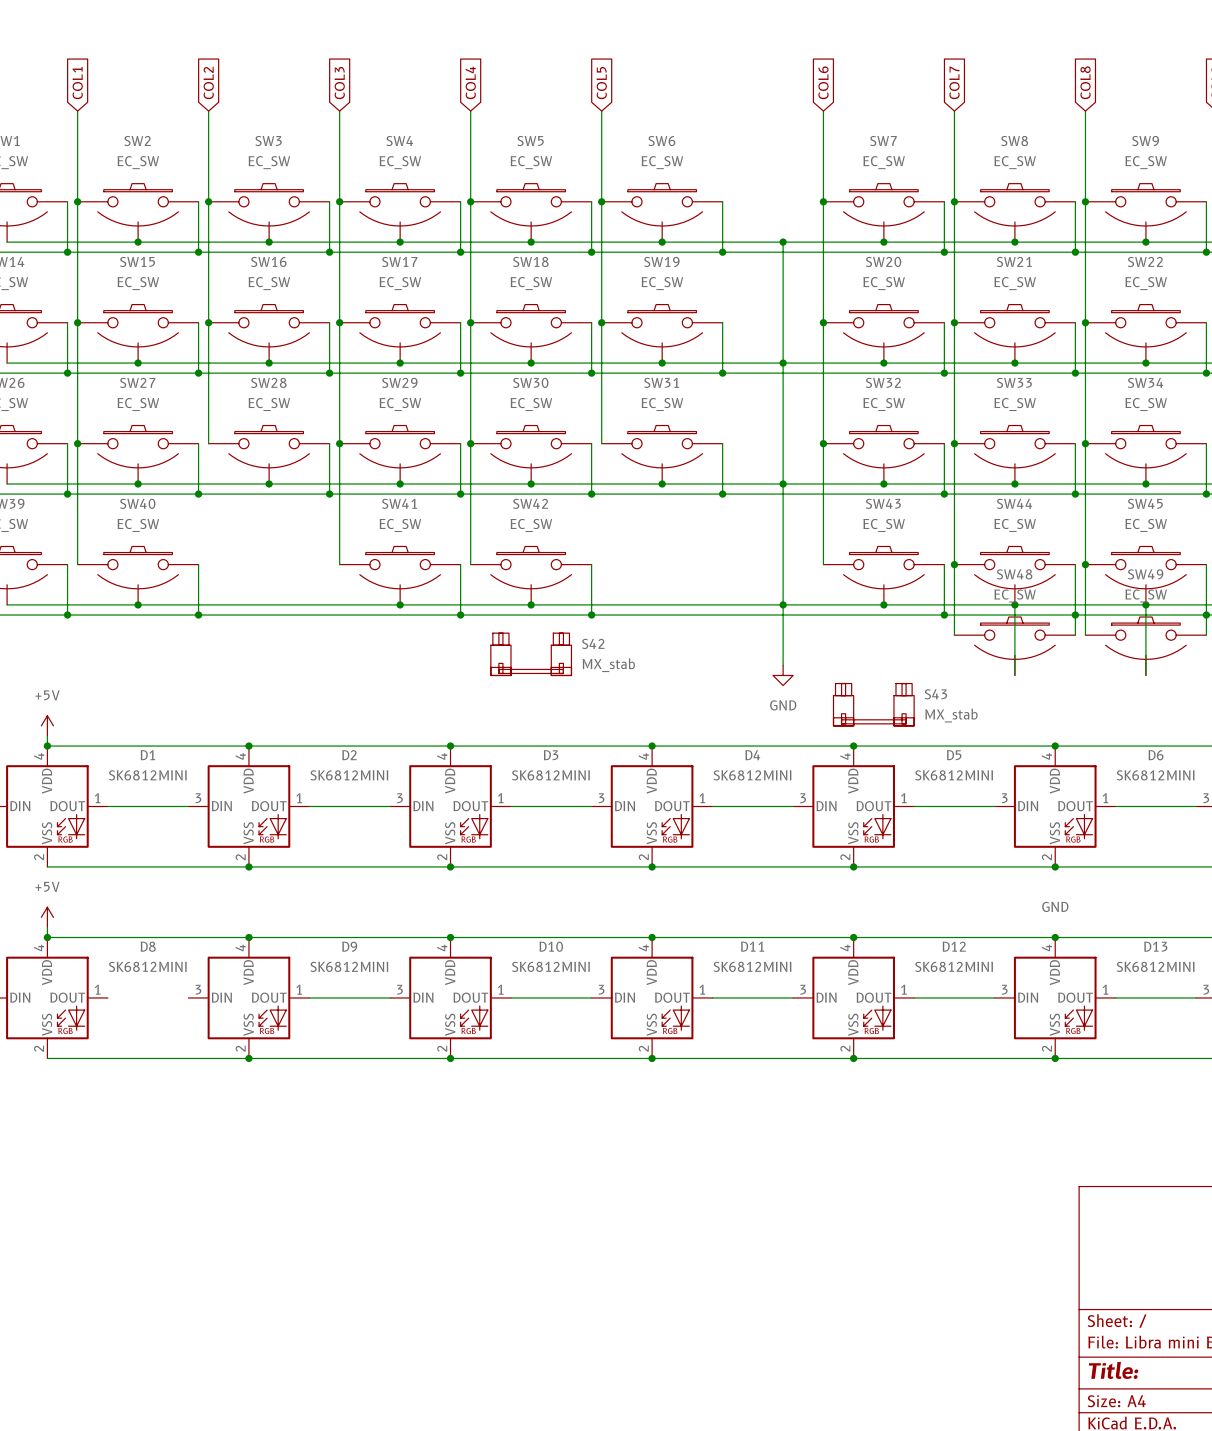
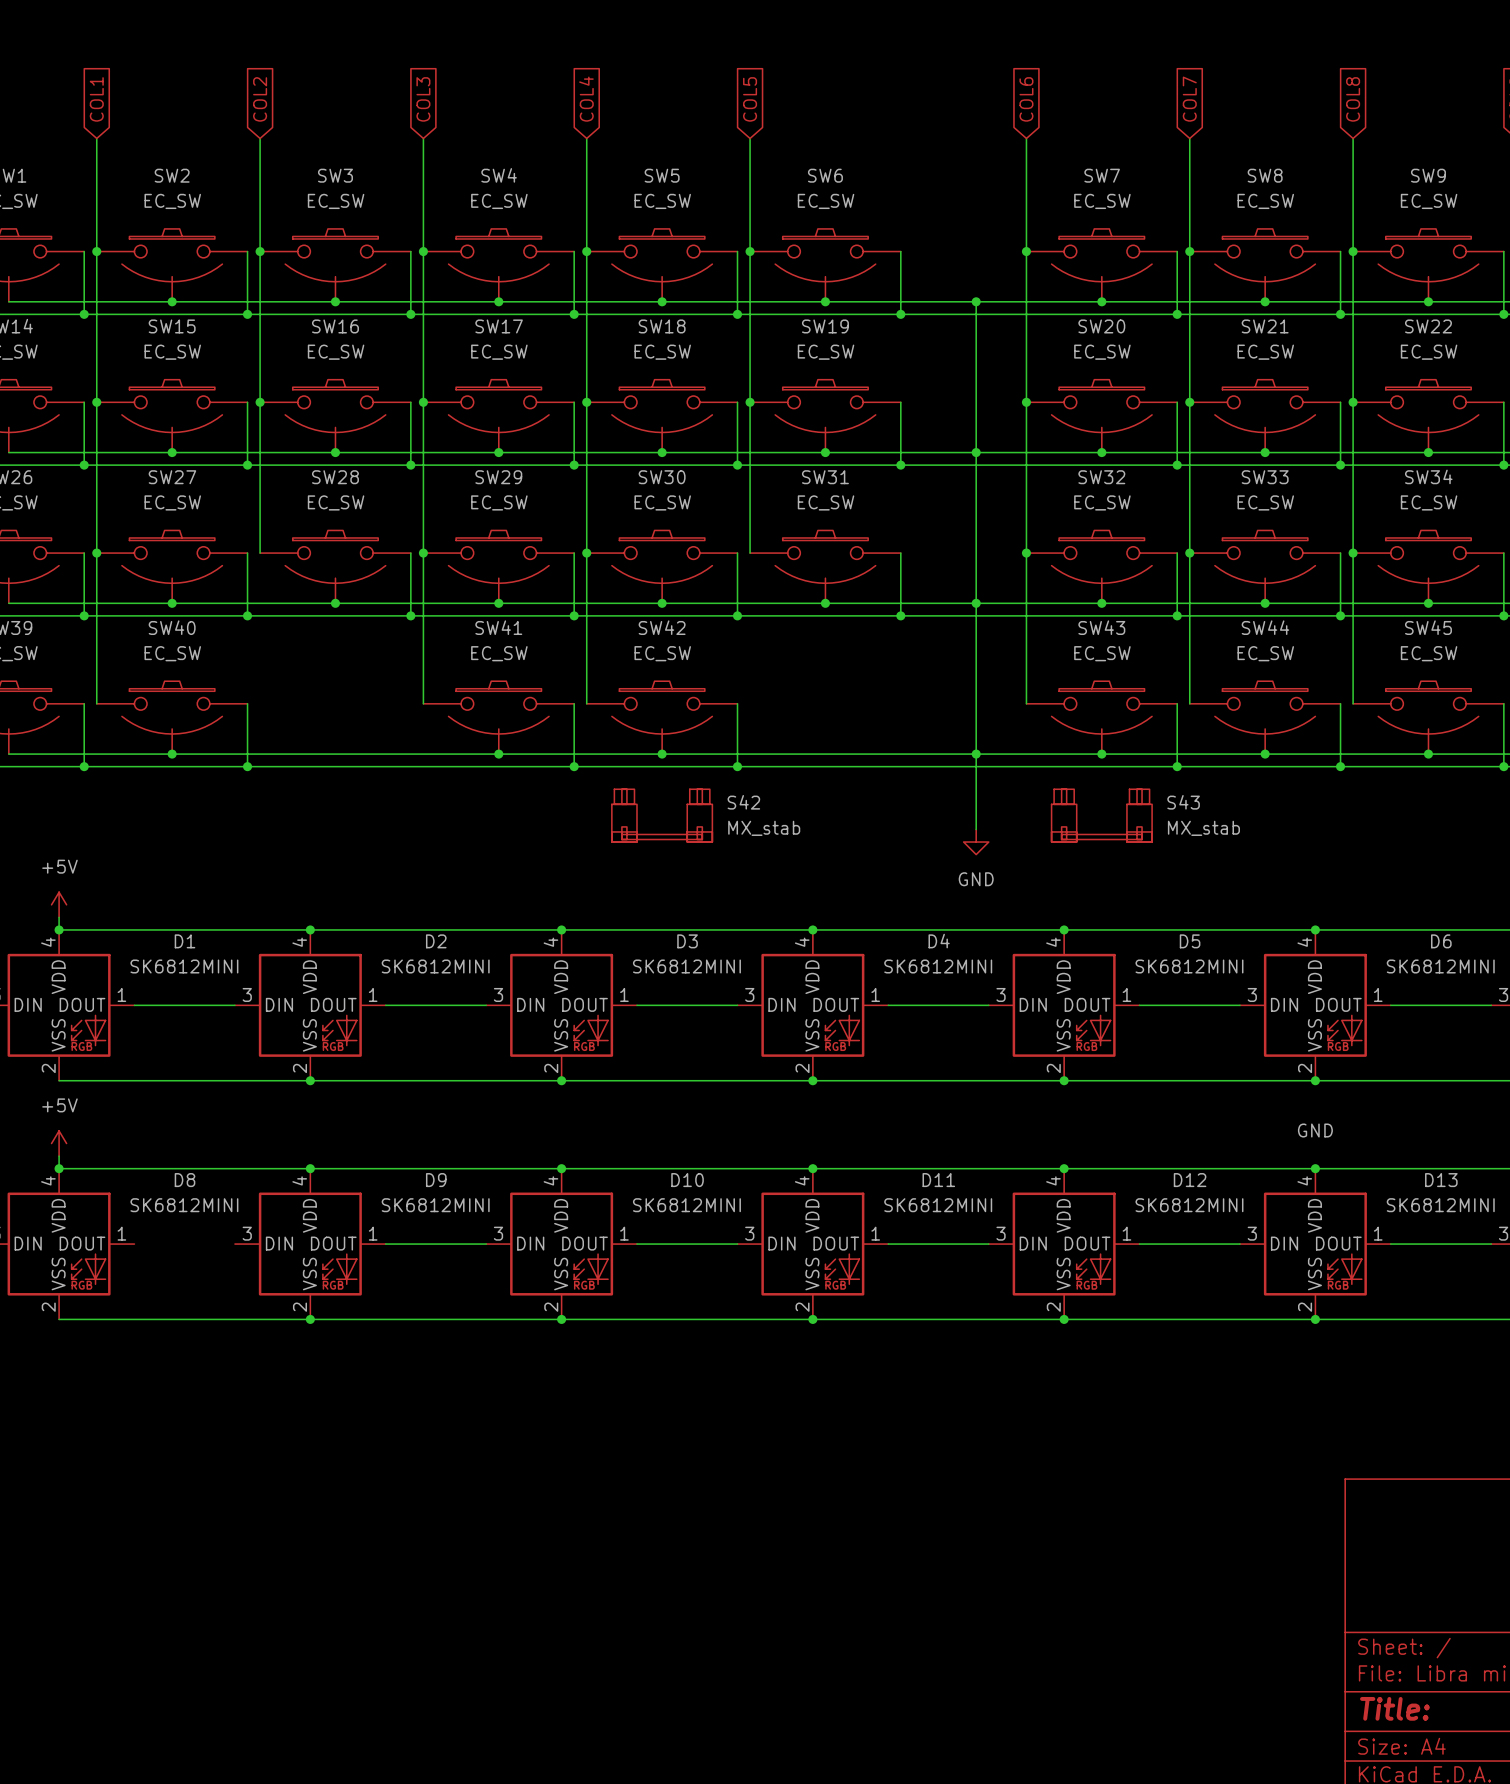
wire: (954, 564) (954, 635) -> none
junction: (954, 564) -> none
wire: (1085, 564) (1085, 635) -> none
junction: (1085, 564) -> none
wire: (1014, 604) (1014, 675) -> none
wire: (1145, 604) (1145, 675) -> none
wire: (1075, 615) (1075, 635) -> none
wire: (1206, 615) (1206, 635) -> none
SW48: EC_SW (1014, 646) -> none
SW49: EC_SW (1145, 646) -> none
S43 position: (873, 704) -> (1101, 815)

